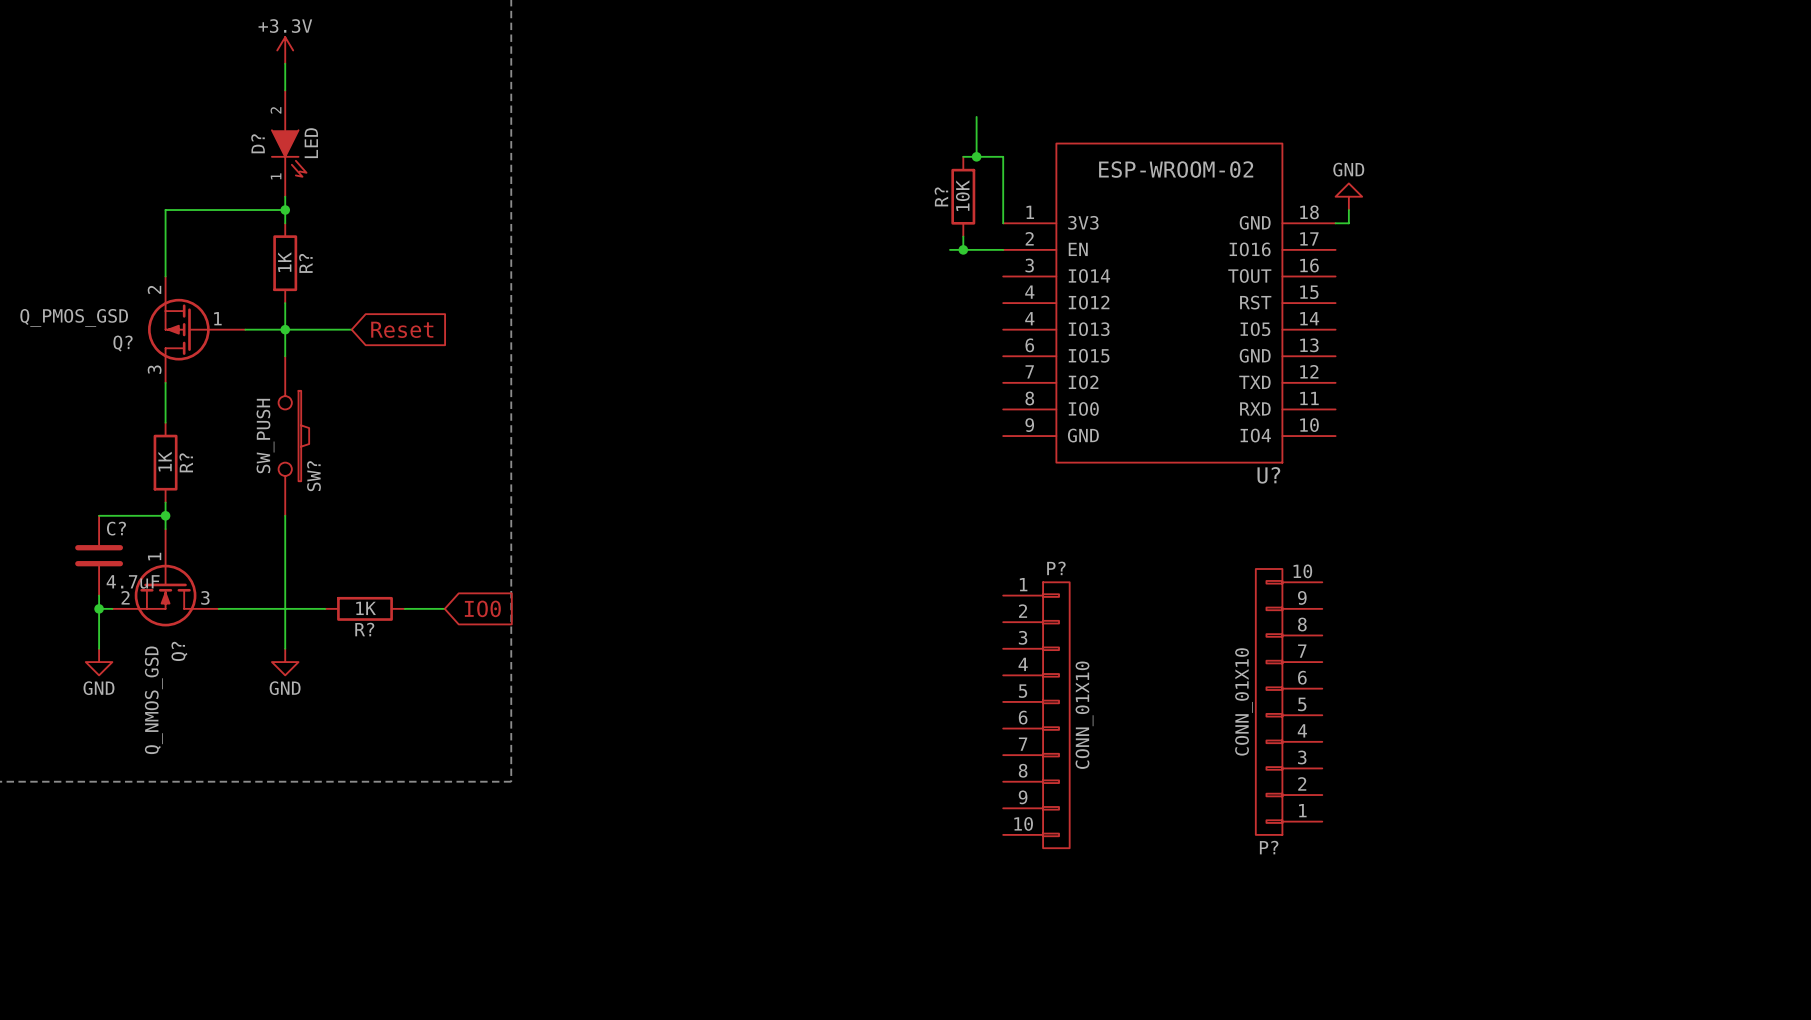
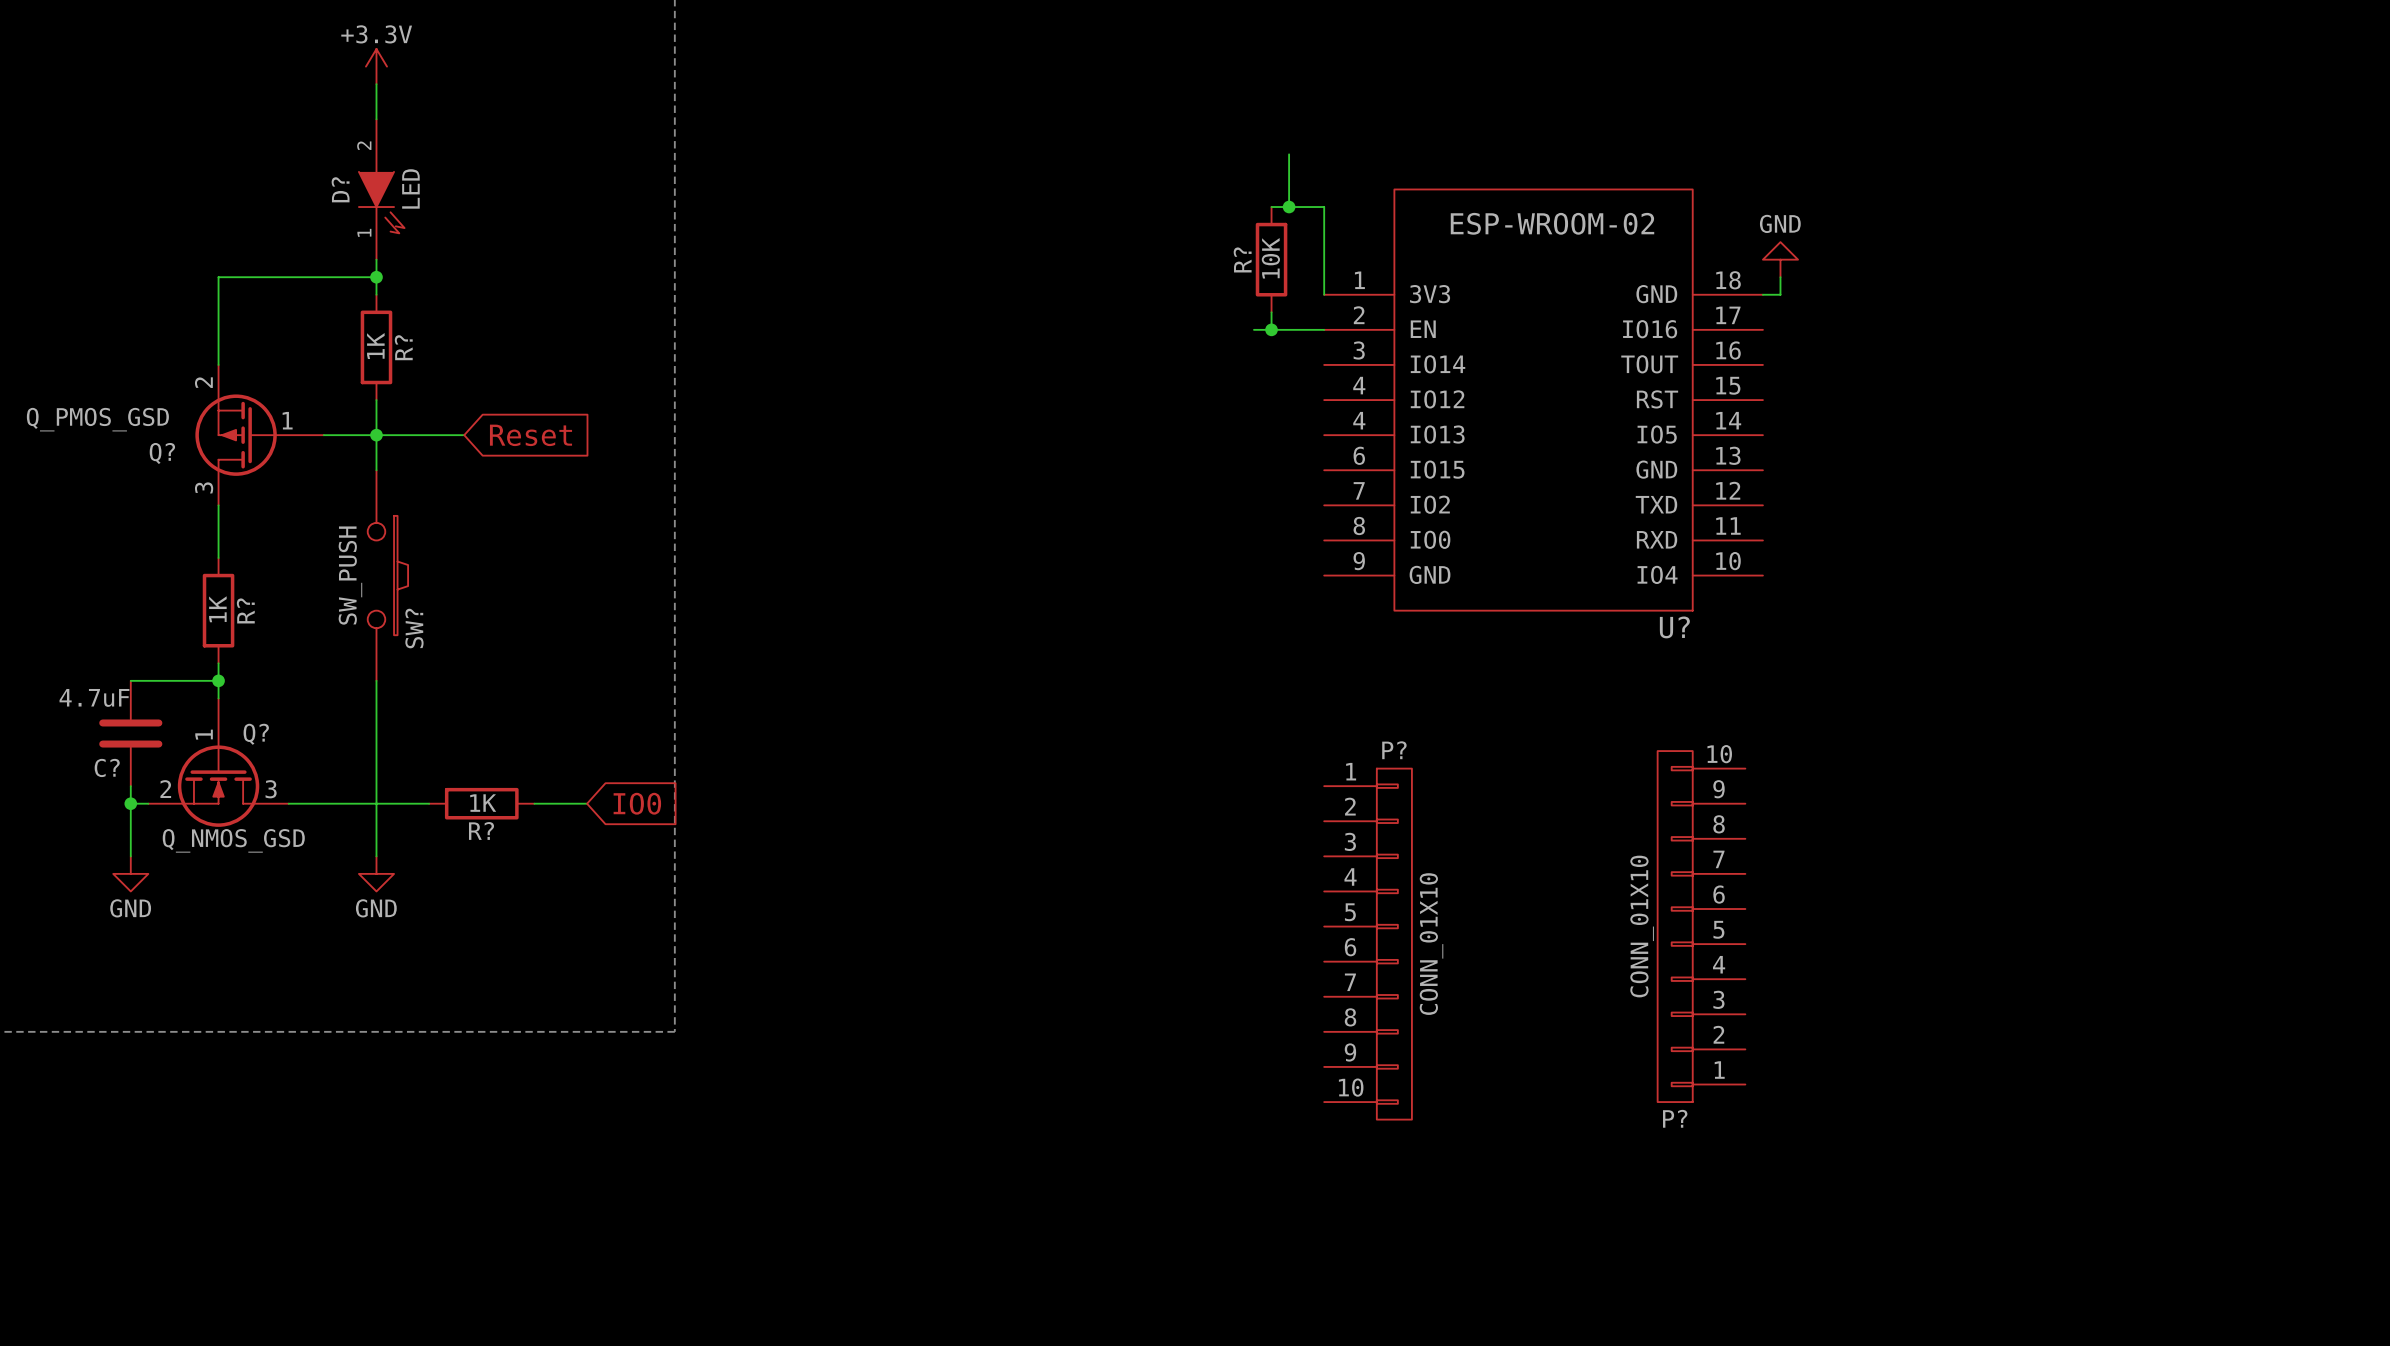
C? name position: C? (116, 528) -> C? (107, 767)
C? value position: 4.7uF (133, 581) -> 4.7uF (94, 697)
Q? name rotation: 0° (179, 651) -> 90° clockwise (256, 734)
Q? name position: Q? (179, 651) -> Q? (256, 734)
Q? value rotation: 0° (153, 700) -> 90° clockwise (233, 840)

